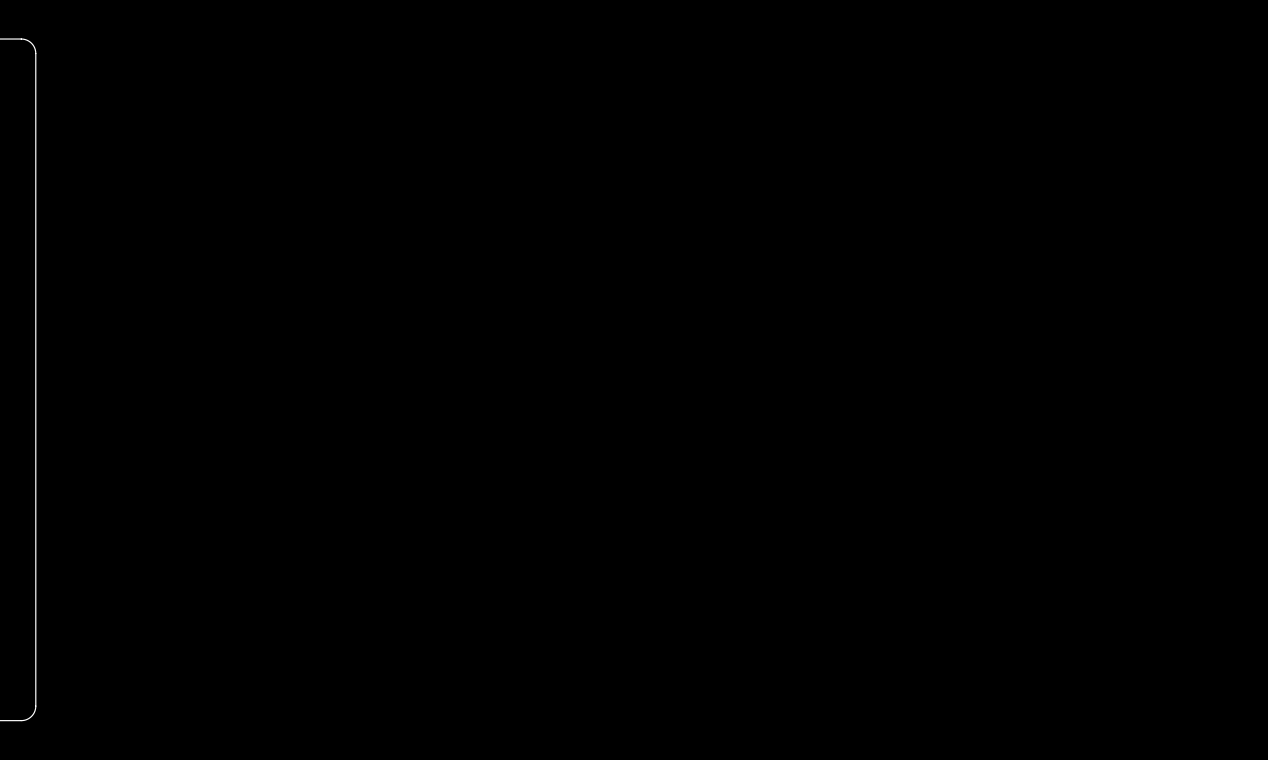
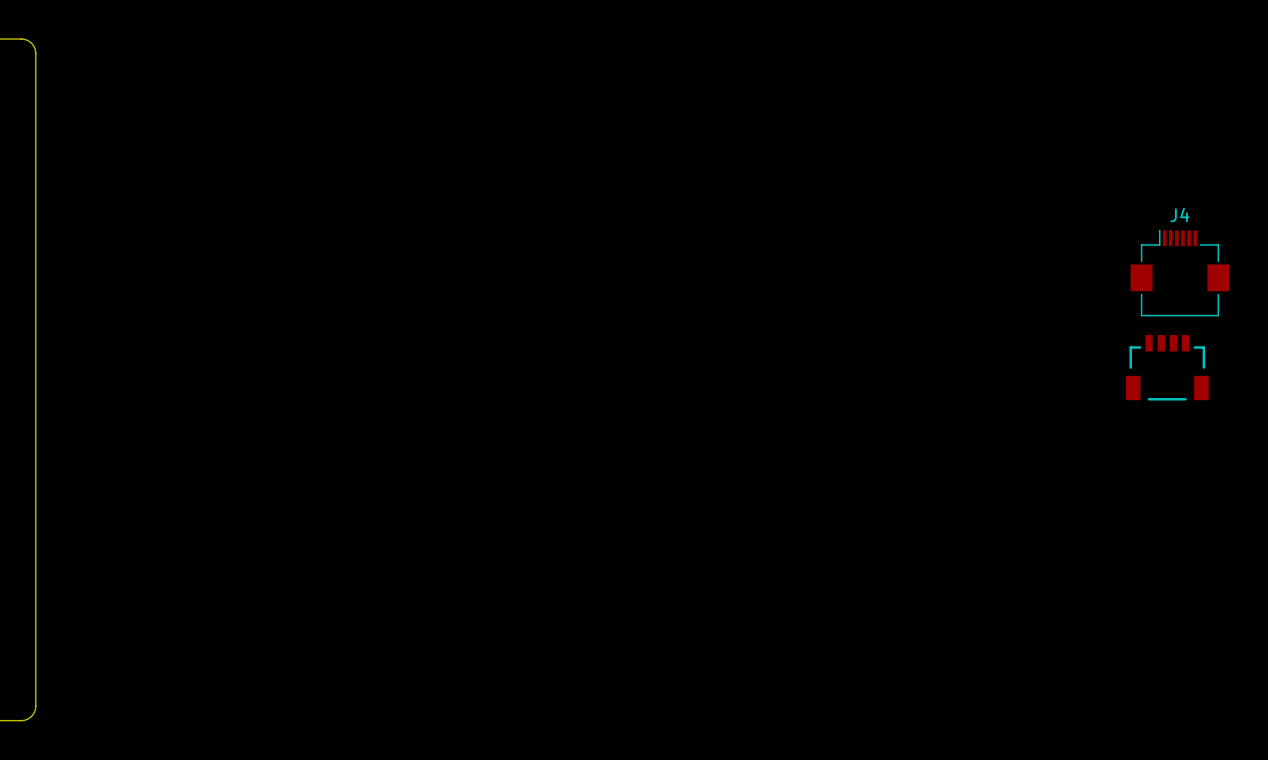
J4: none -> (1179, 272)
part: none -> (1167, 367)

